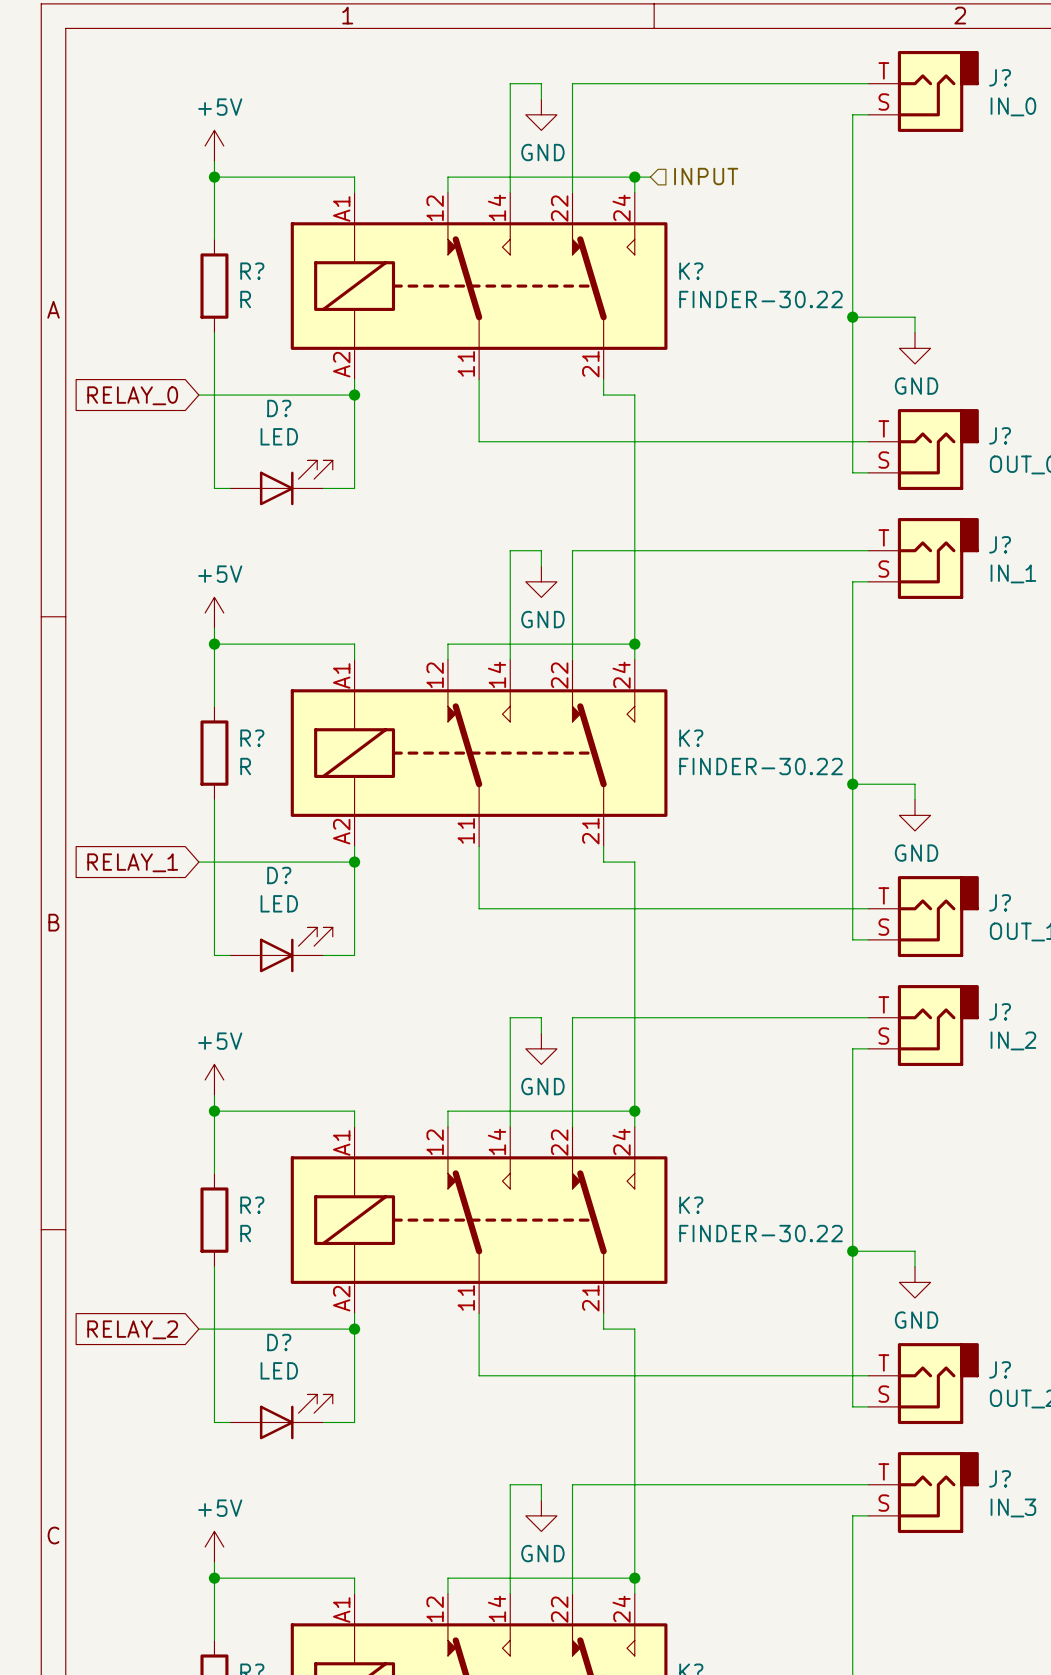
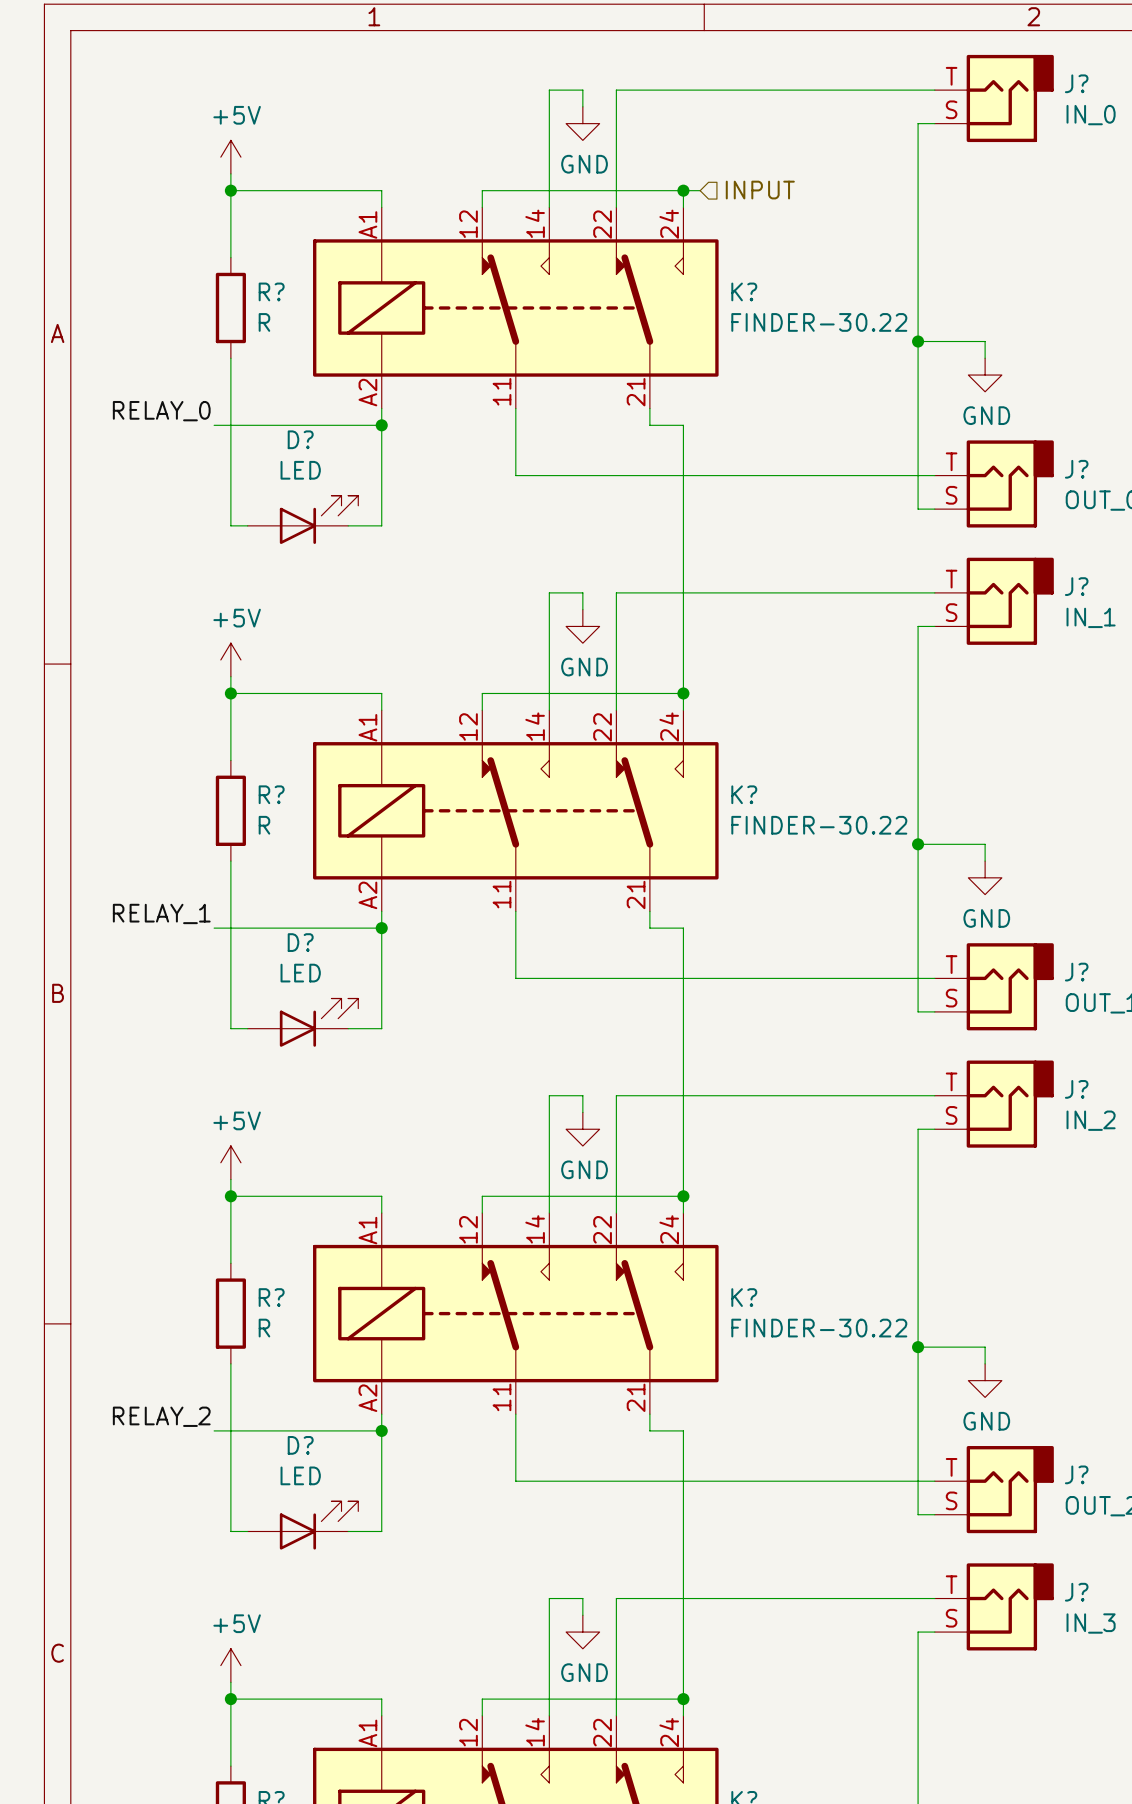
label: none -> RELAY_0 (161, 411)
global label: RELAY_0 (132, 395) -> none
label: none -> RELAY_1 (161, 913)
global label: RELAY_1 (132, 862) -> none
label: none -> RELAY_2 (161, 1416)
global label: RELAY_2 (132, 1329) -> none

